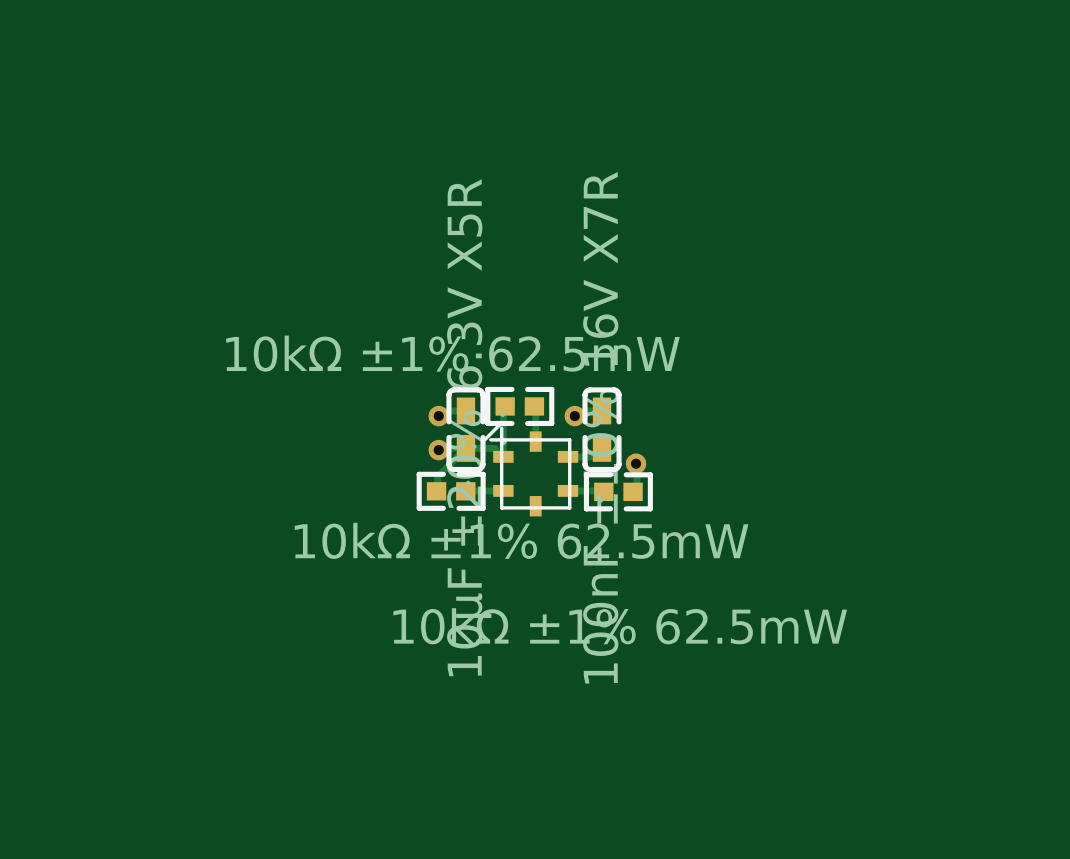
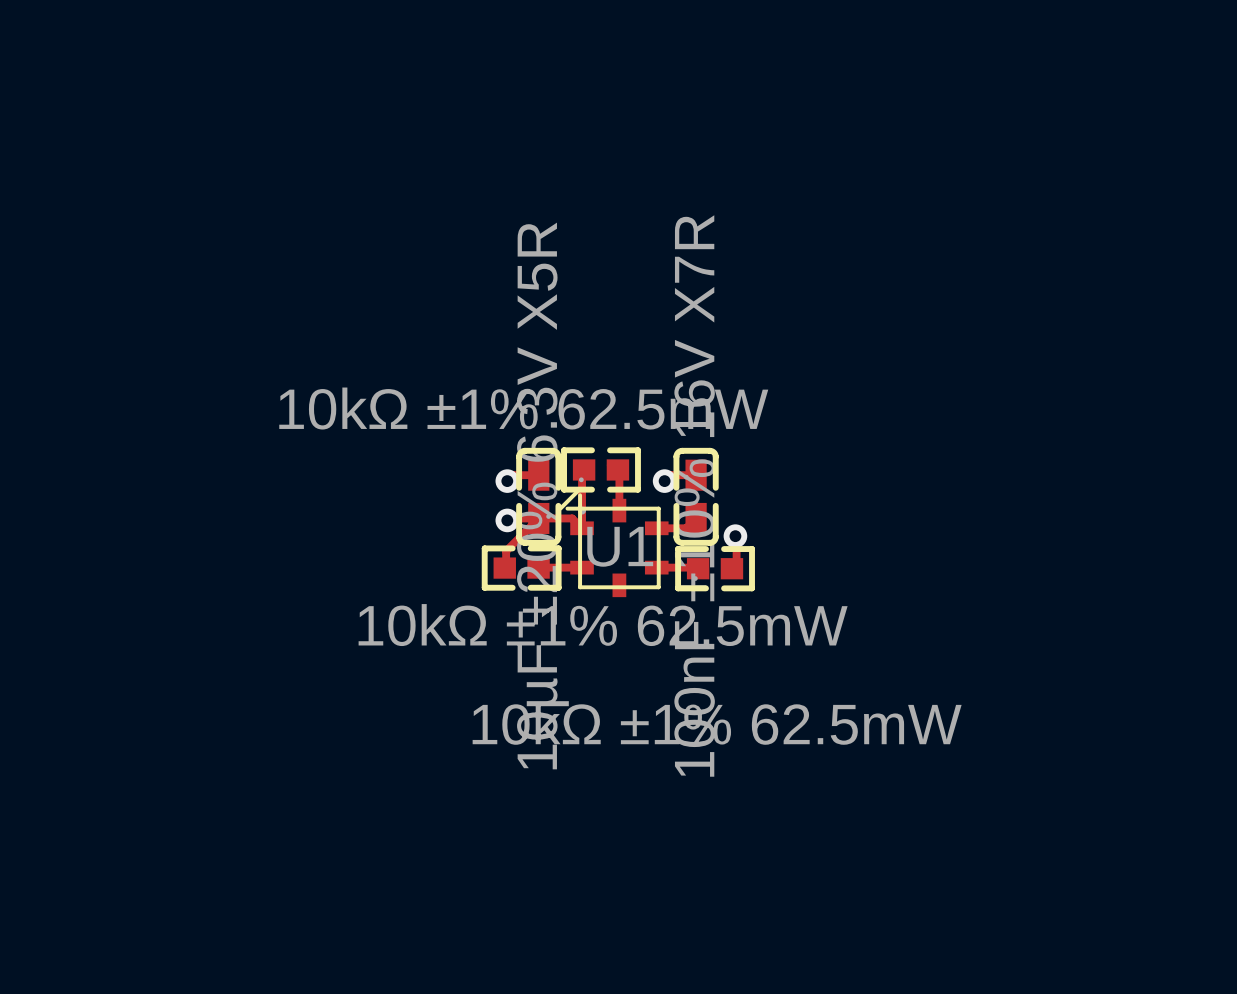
U1 name: none -> U1 (620, 546)

